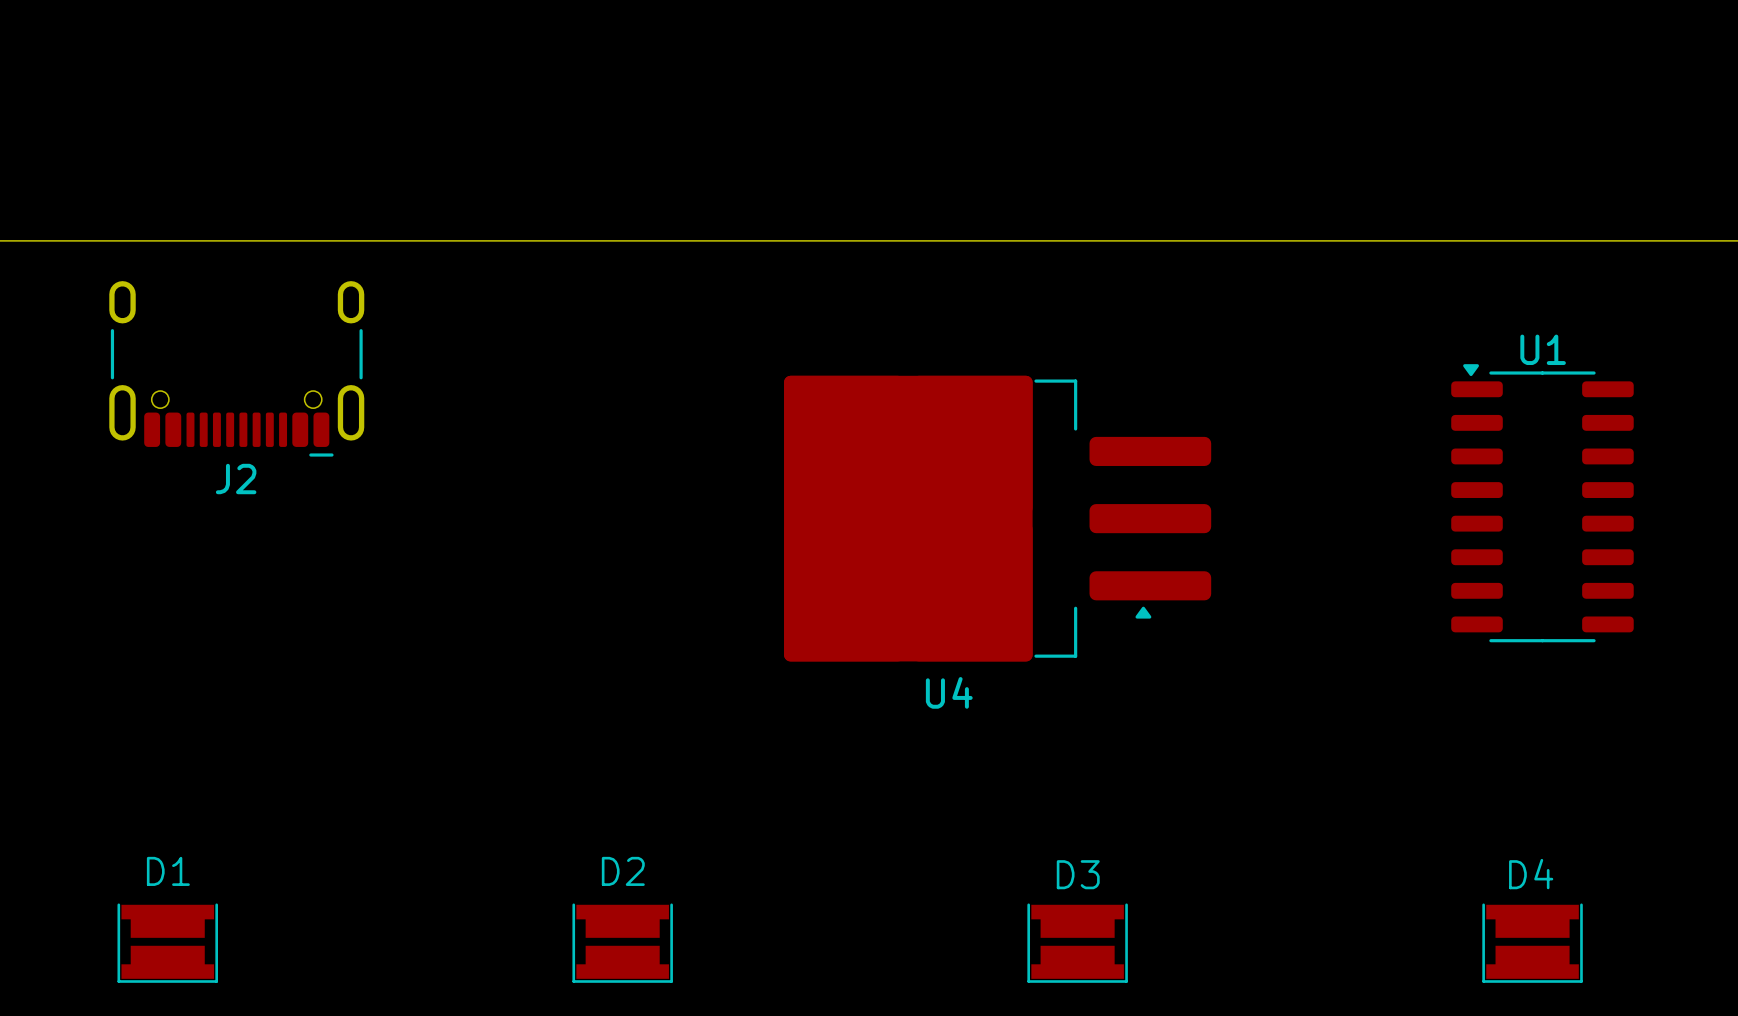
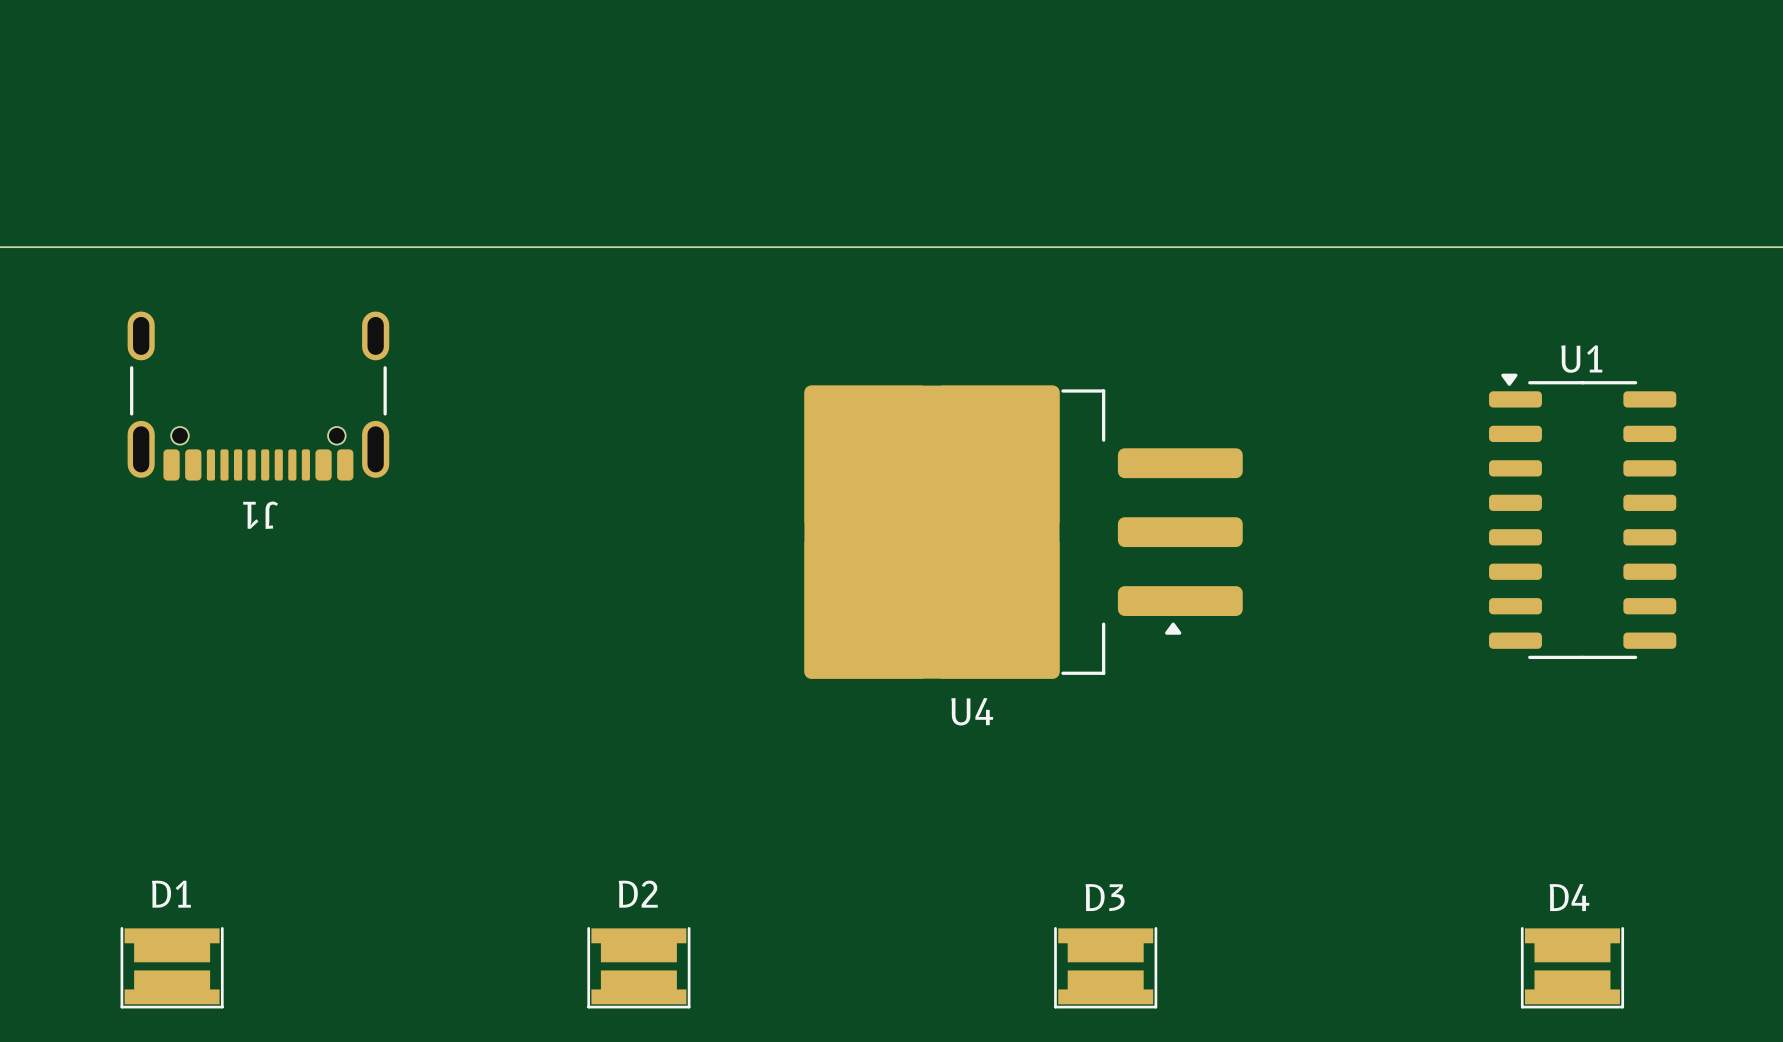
J2: (236, 368) -> none
J1: none -> (258, 396)

